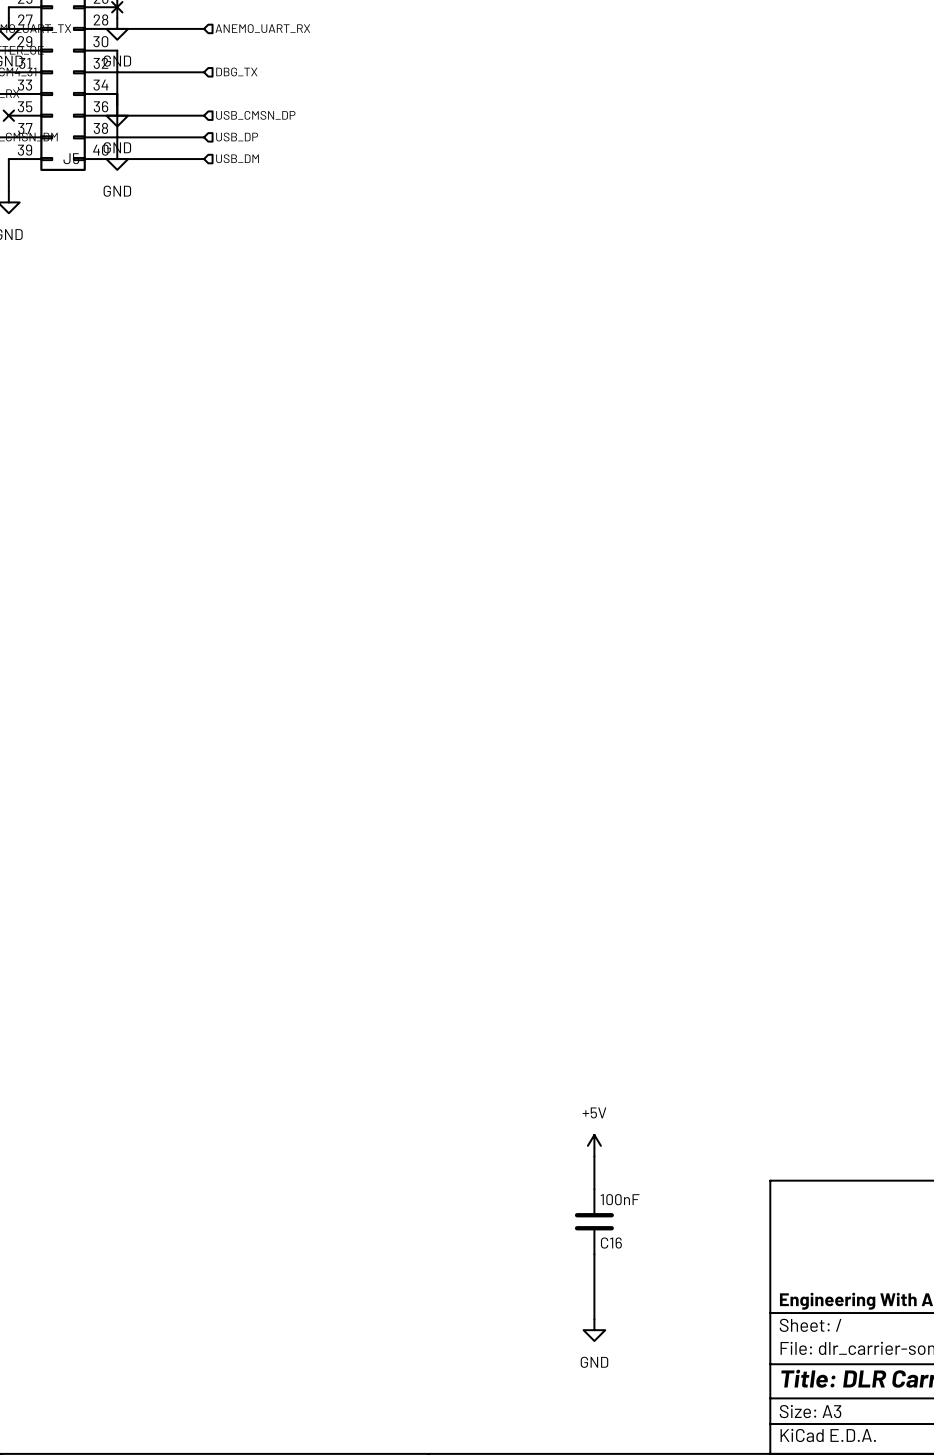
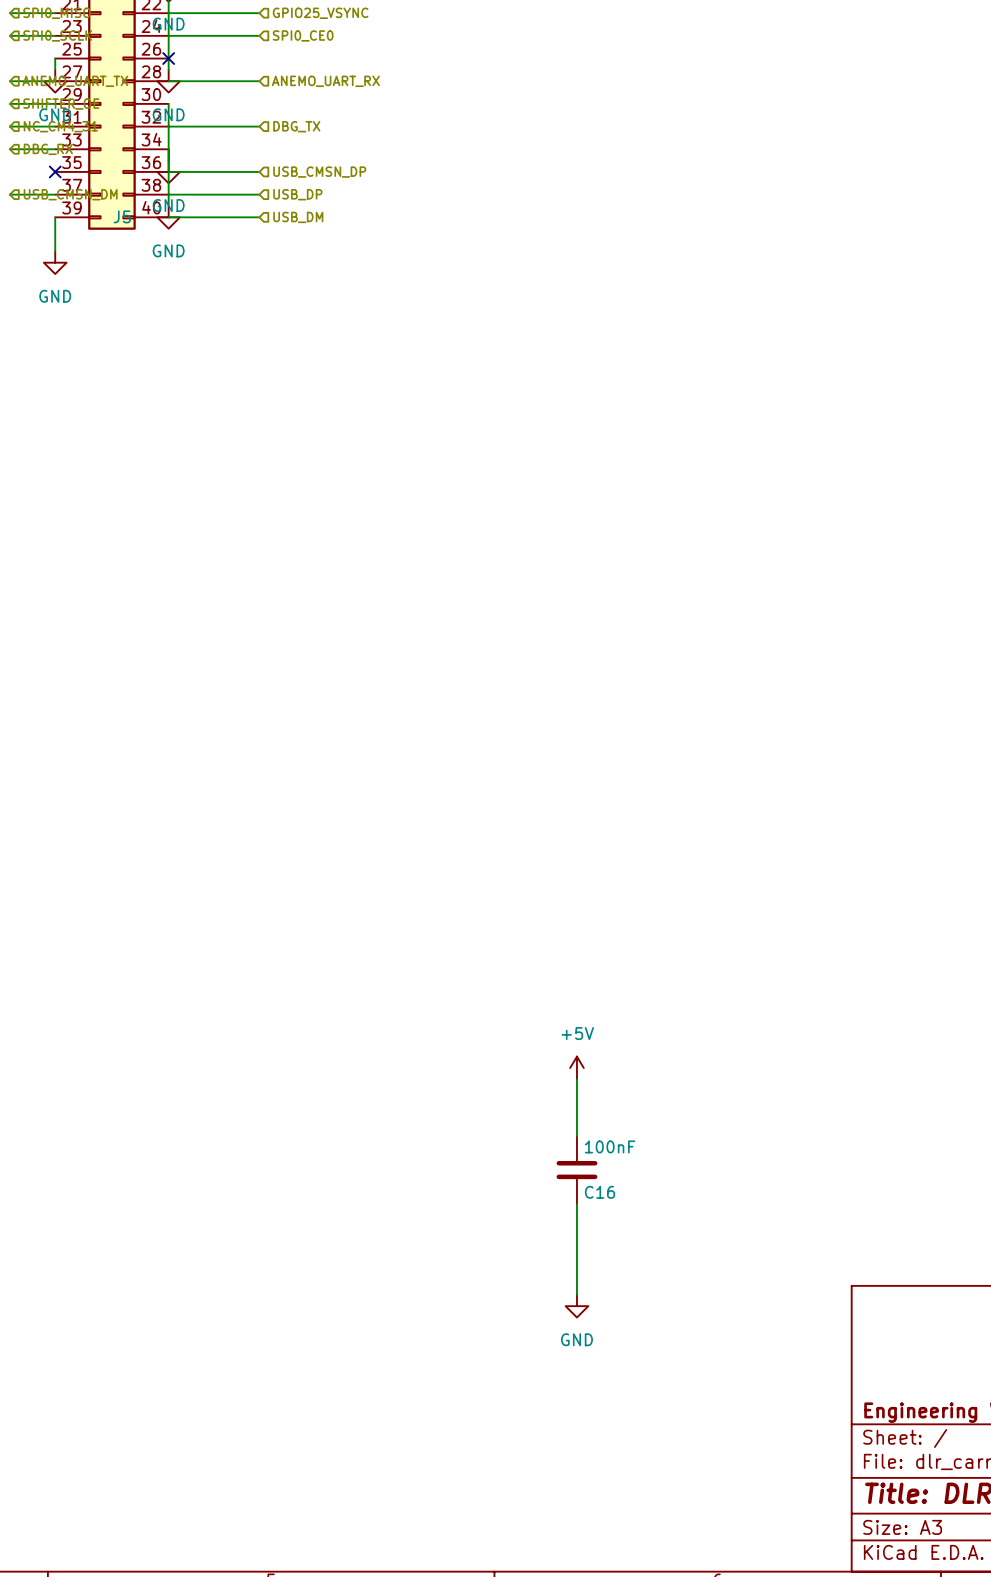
wire: none -> (576, 1079) (576, 1136)
wire: none -> (576, 1204) (576, 1294)
power symbol position: +5V (594, 1145) -> +5V (576, 1067)
wire: (594, 1156) (594, 1189) -> none
C16 position: (594, 1221) -> (576, 1170)
wire: (594, 1254) (594, 1319) -> none
power symbol position: GND (594, 1330) -> GND (576, 1306)

